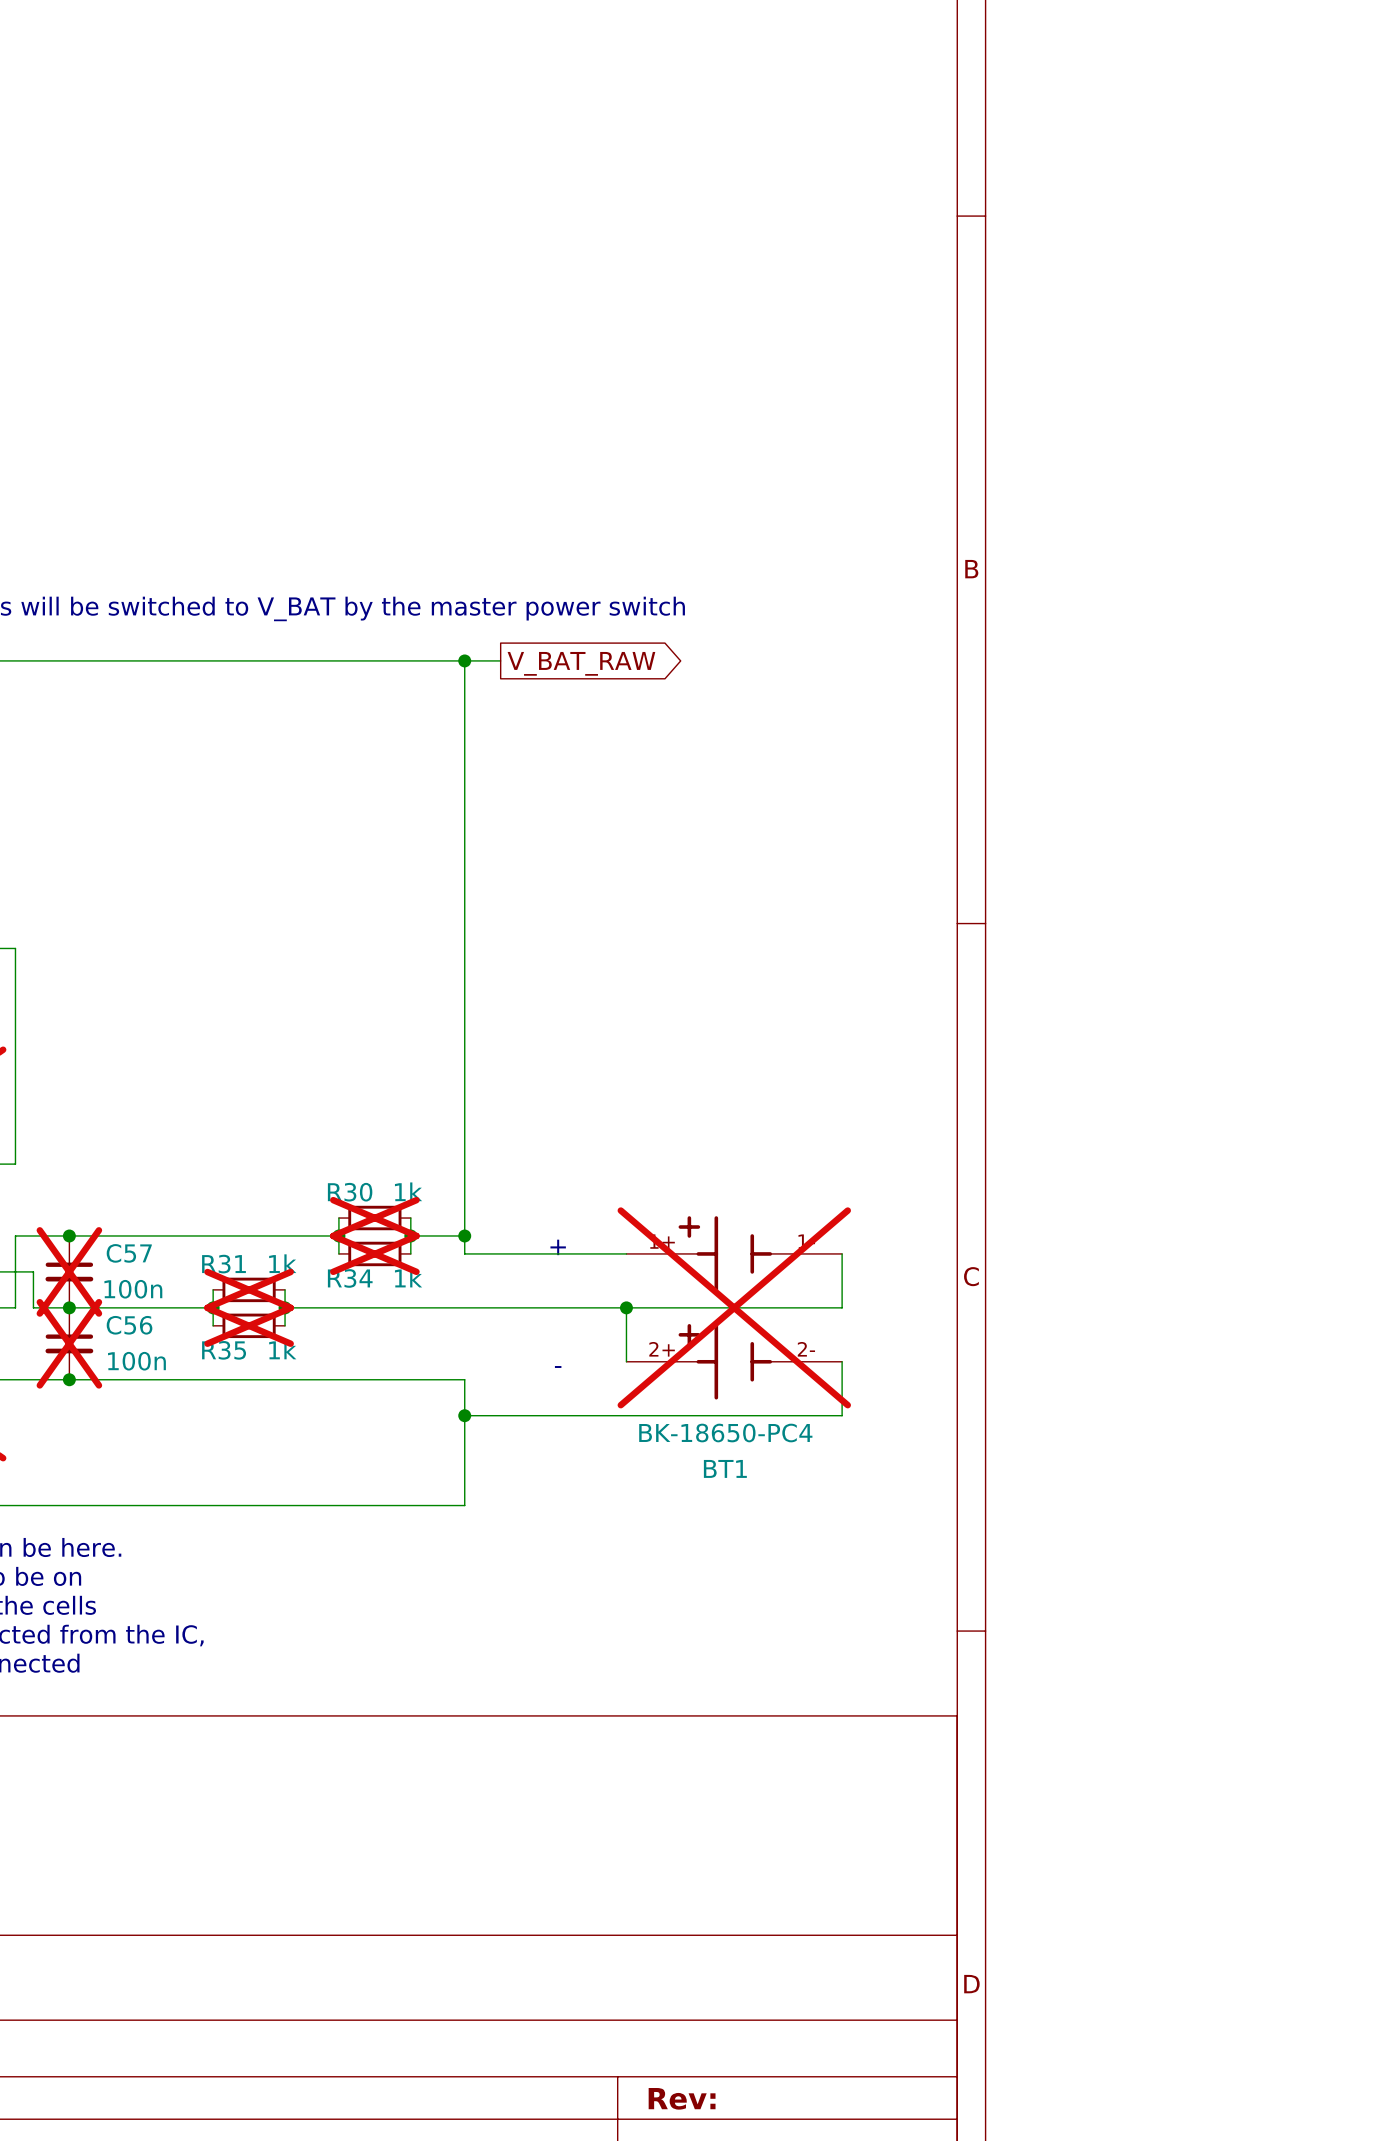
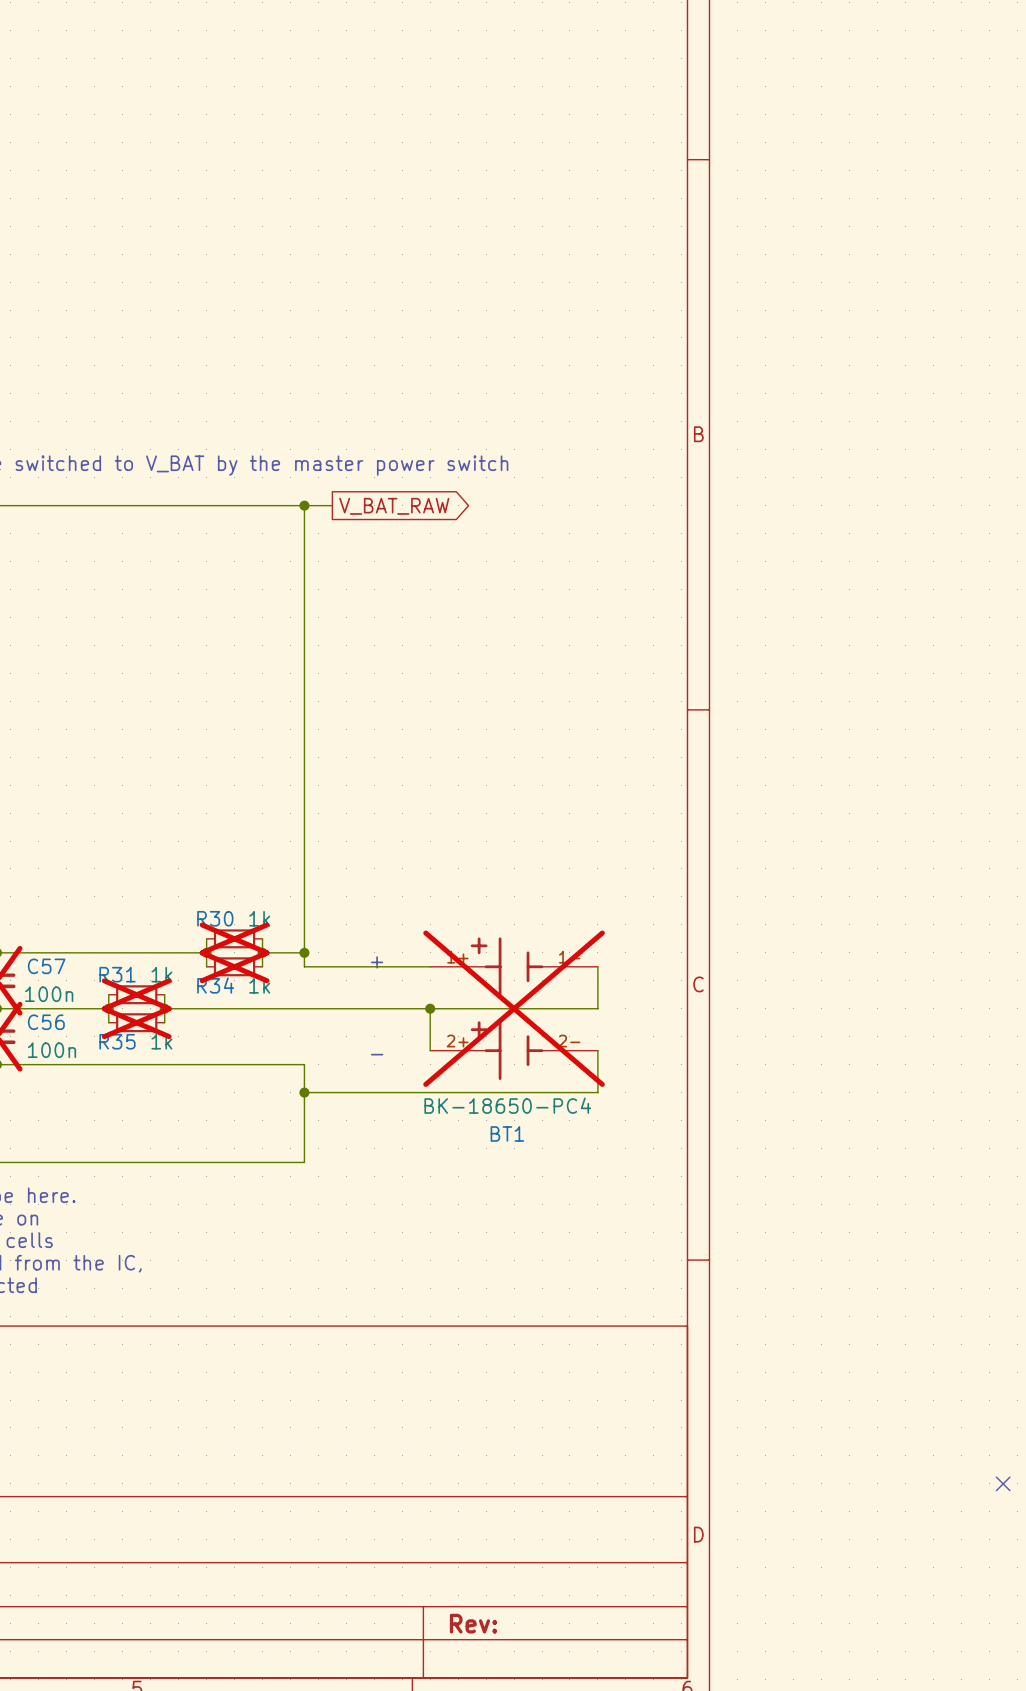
no-connect mark: none -> (1003, 1483)

